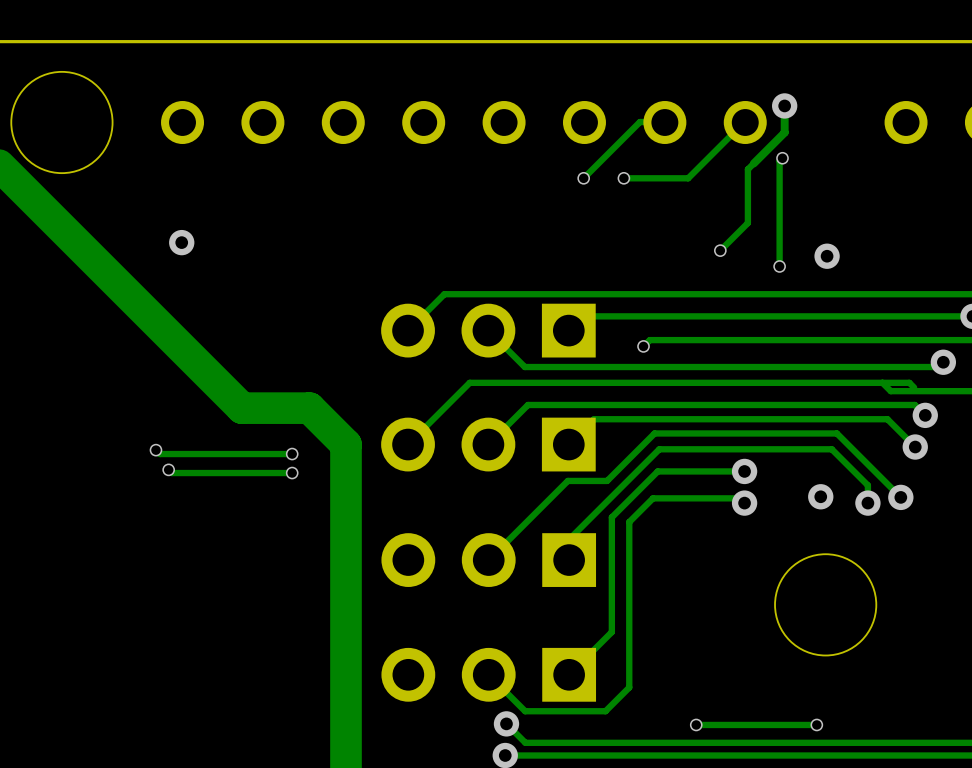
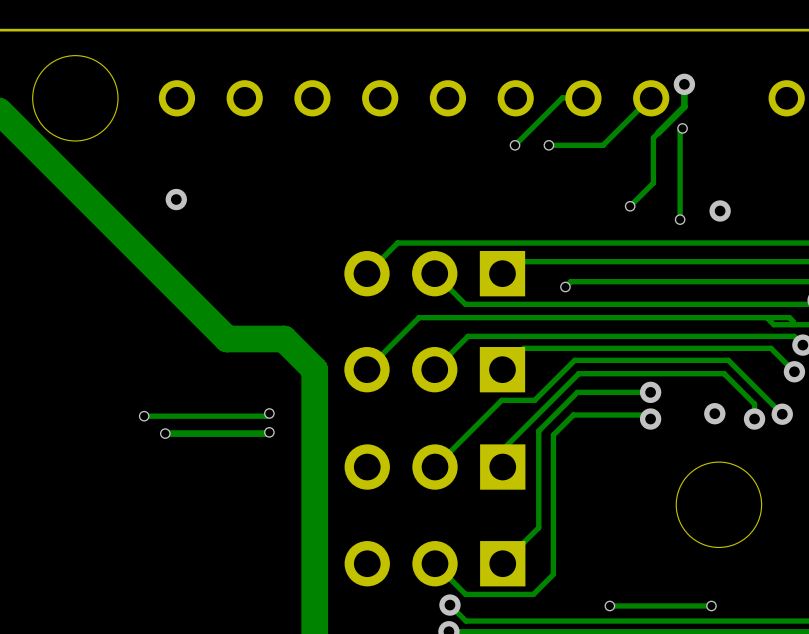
track: (155, 450) (159, 454) (292, 454) -> none
via: (155, 450) -> none
via: (292, 454) -> none
track: (168, 469) (171, 473) (292, 473) -> none
via: (168, 469) -> none
via: (292, 473) -> none
track: none -> (269, 413) (266, 416) (144, 416)
via: none -> (269, 413)
via: none -> (144, 416)
track: none -> (269, 432) (165, 433)
via: none -> (269, 432)
via: none -> (165, 433)

